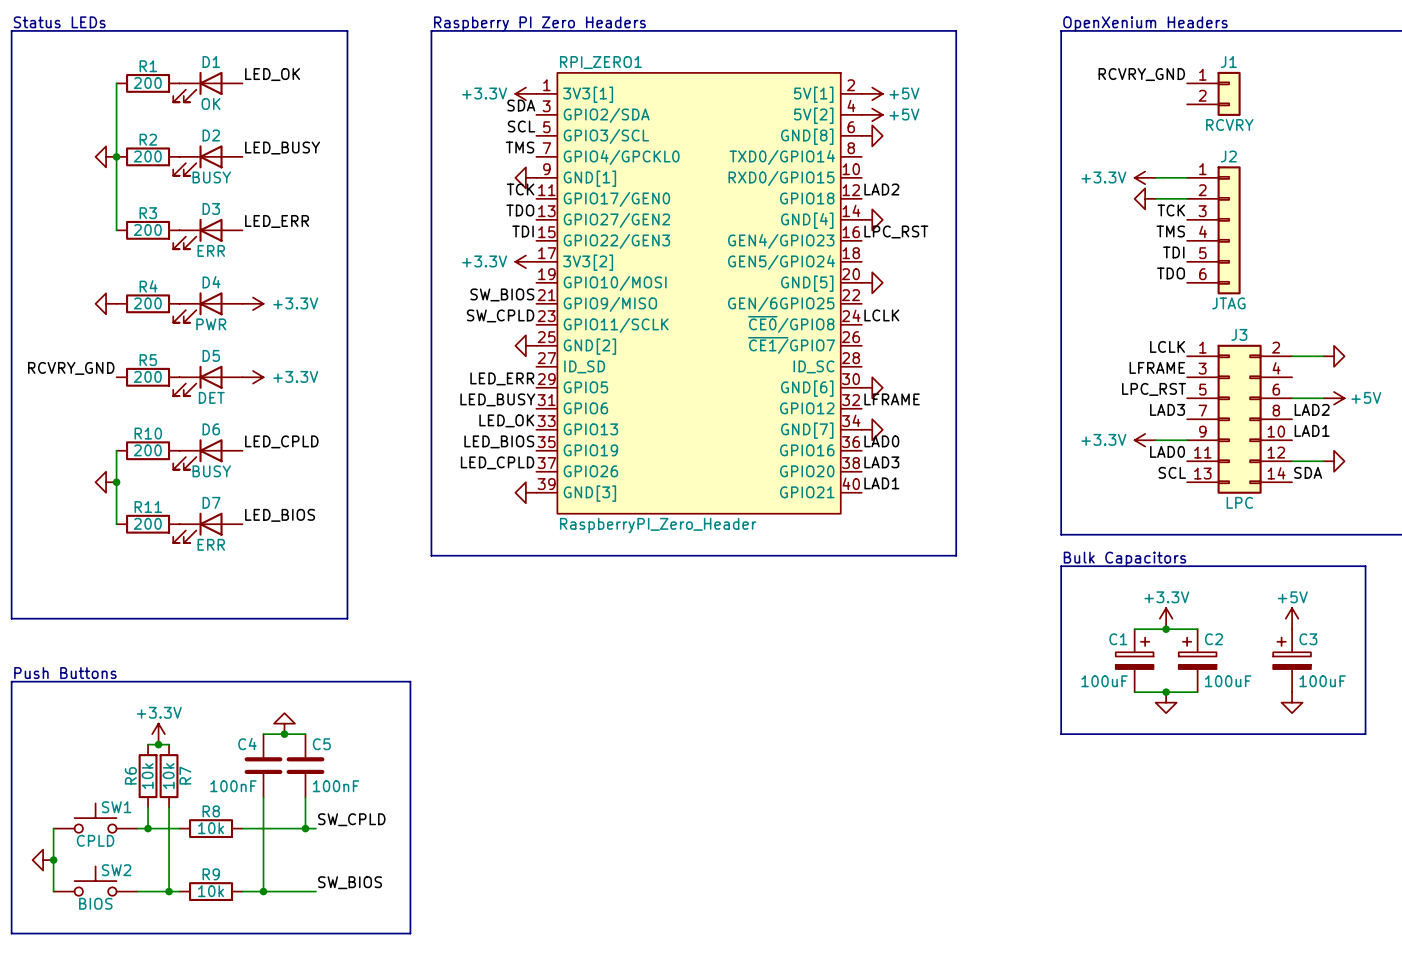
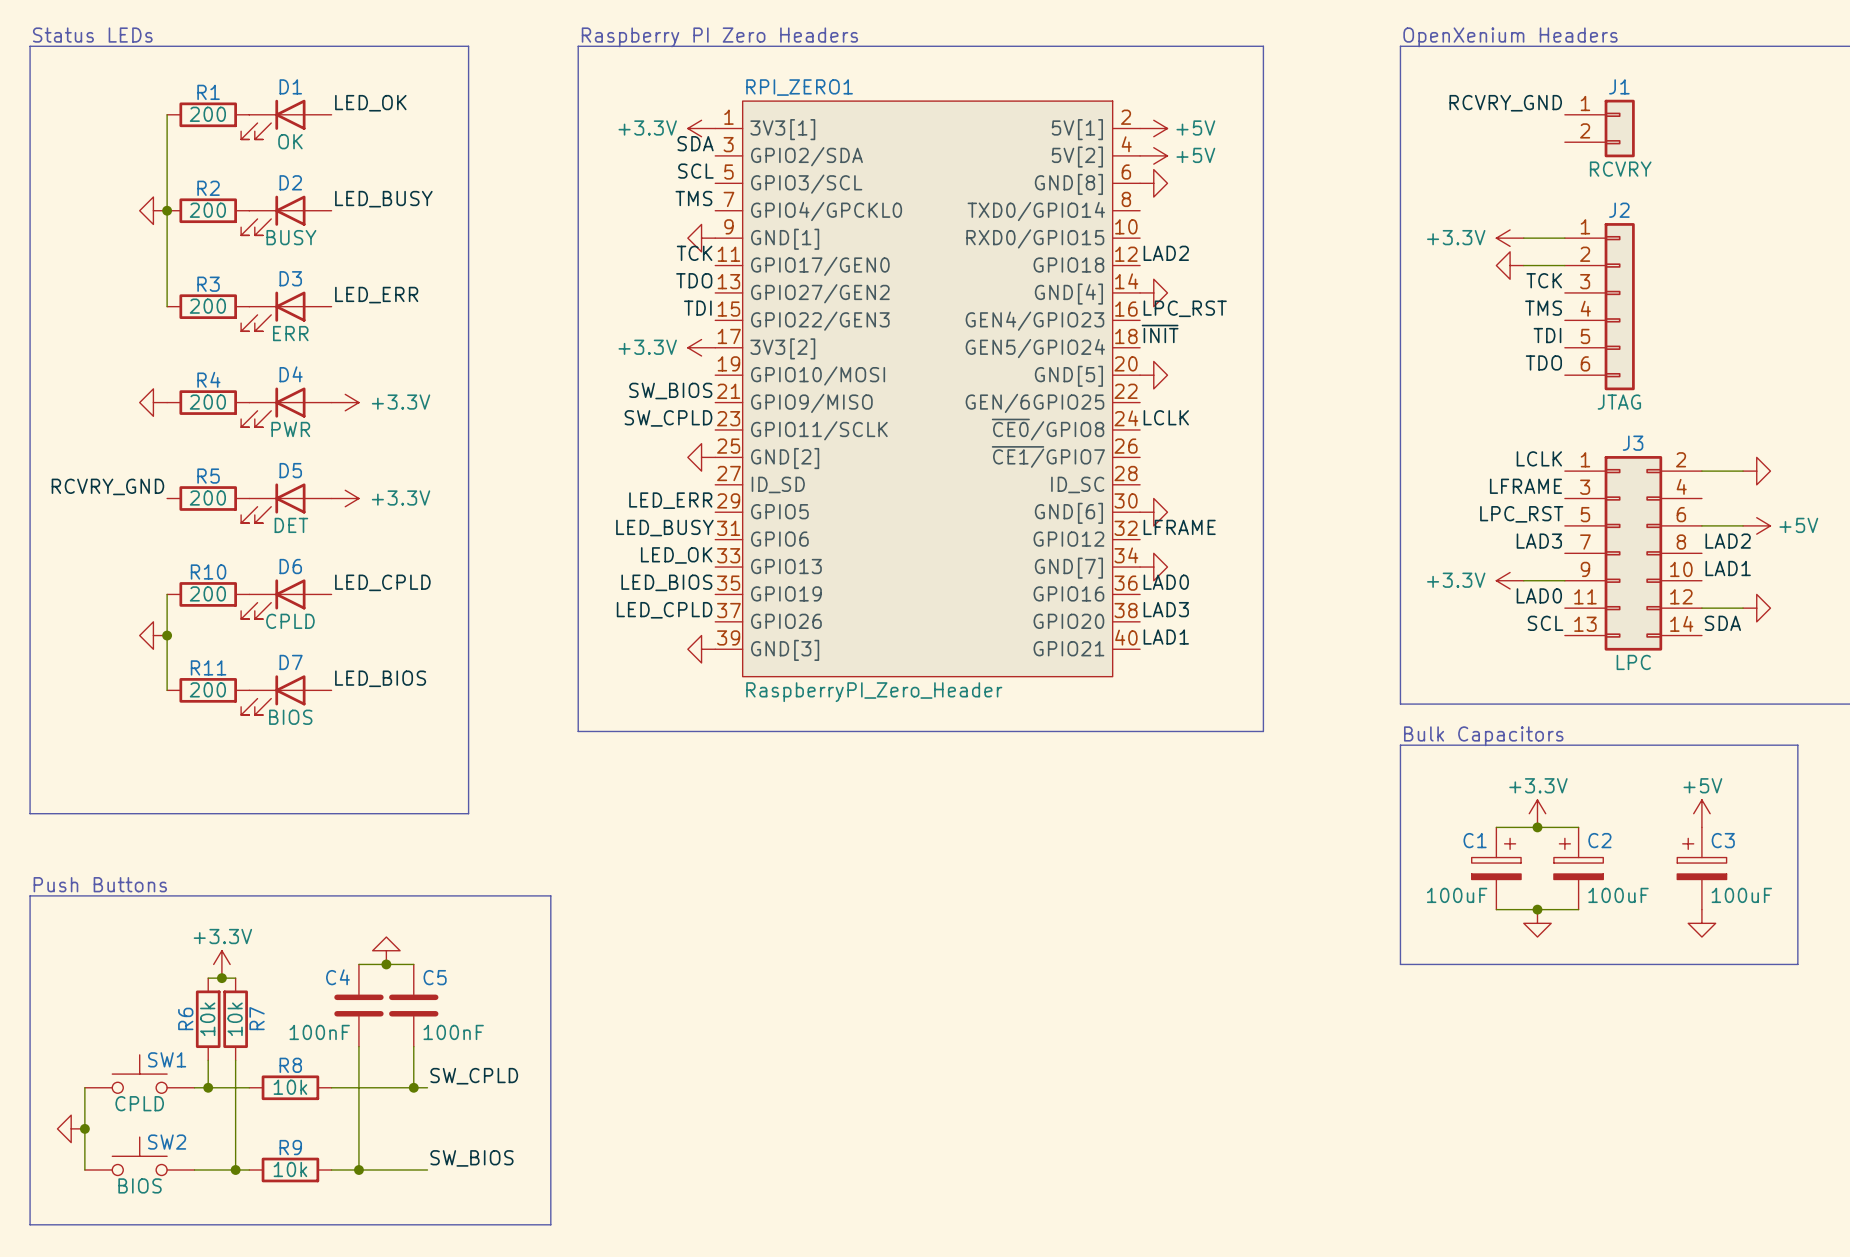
label: none -> ~{INIT} (1160, 333)
D6 value: BUSY (211, 471) -> CPLD (290, 621)
D7 value: ERR (211, 544) -> BIOS (290, 717)

